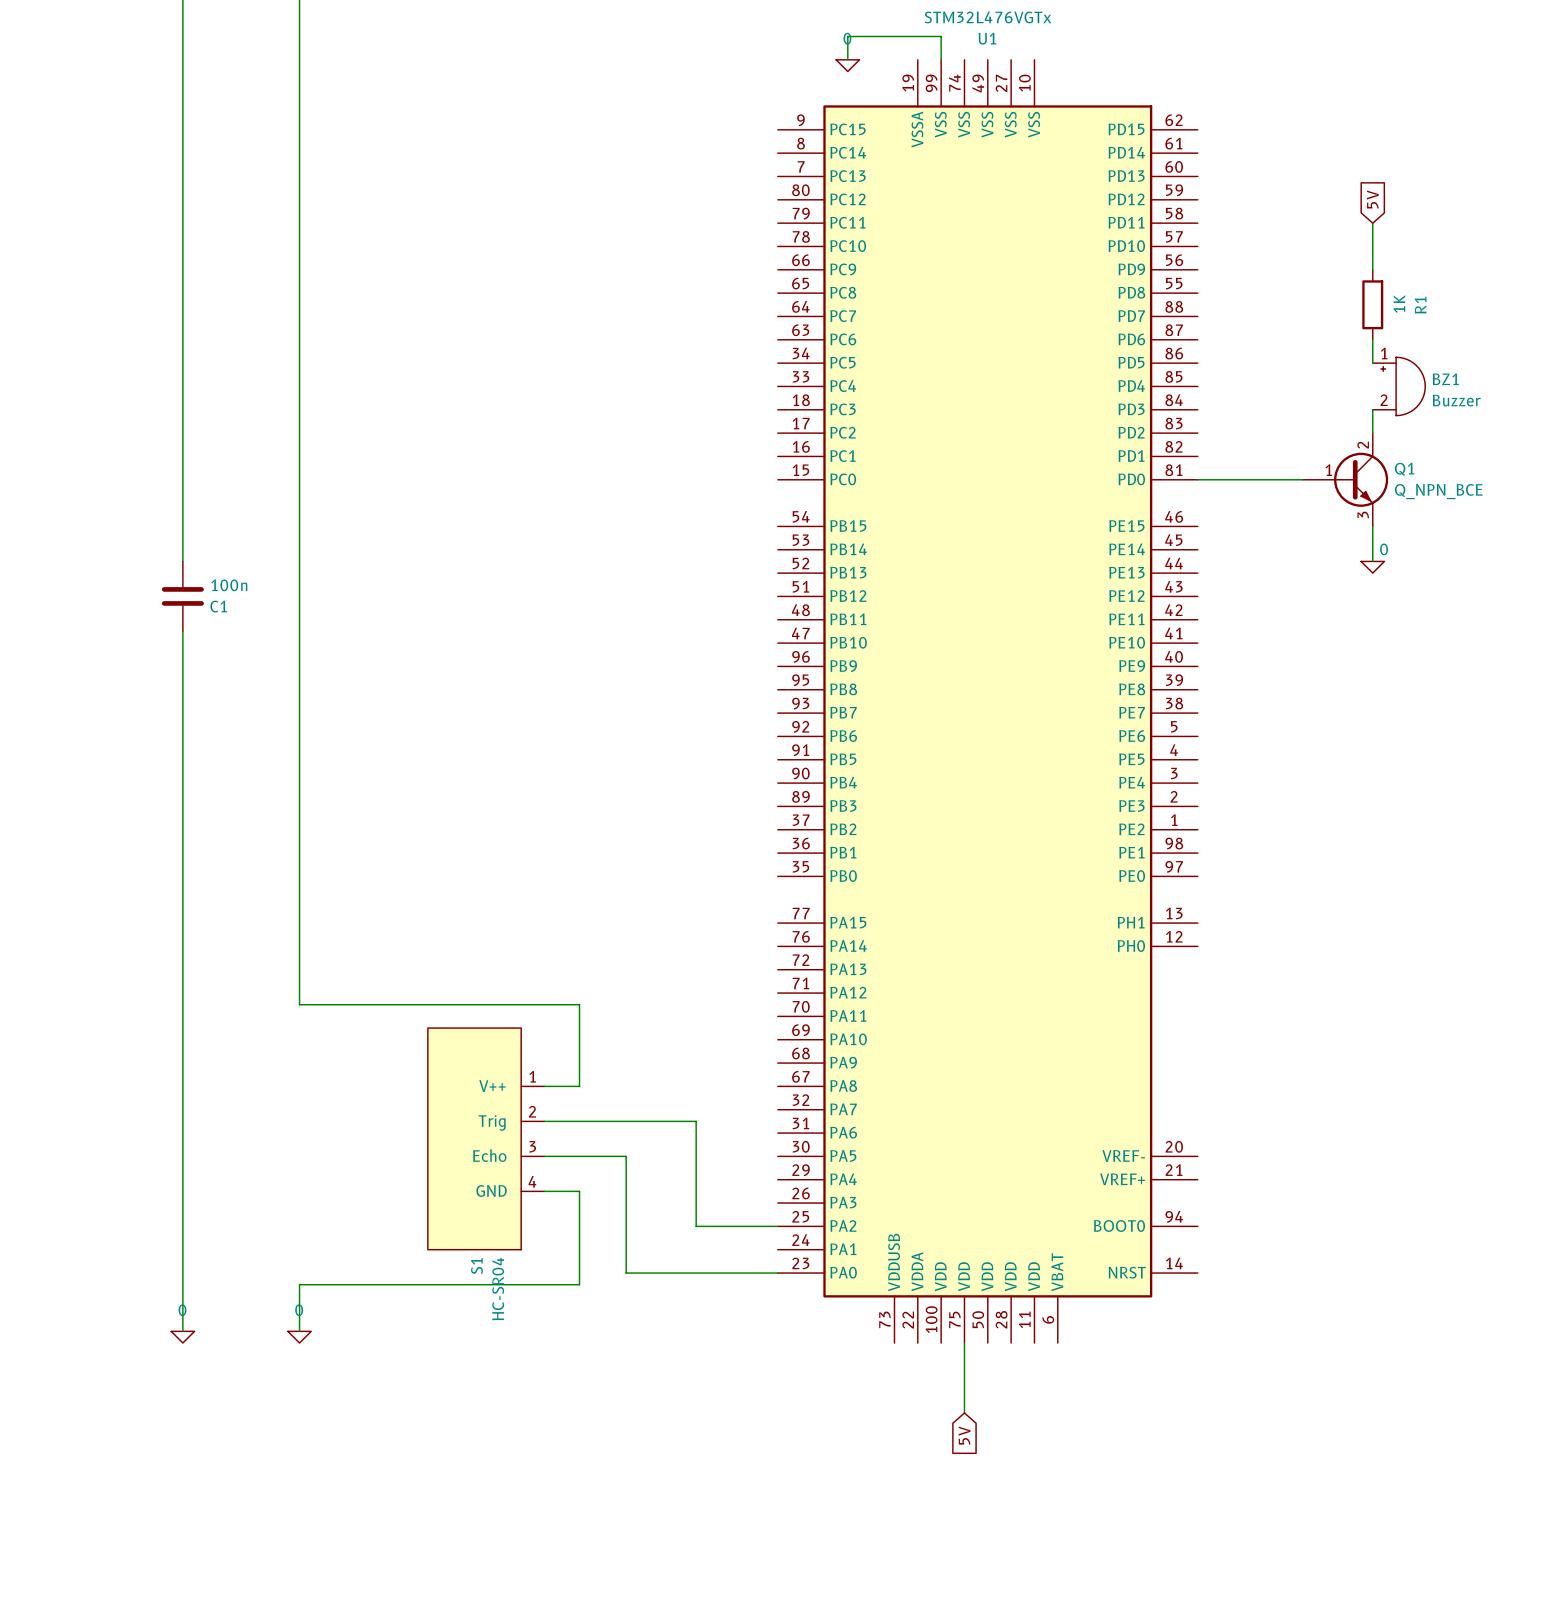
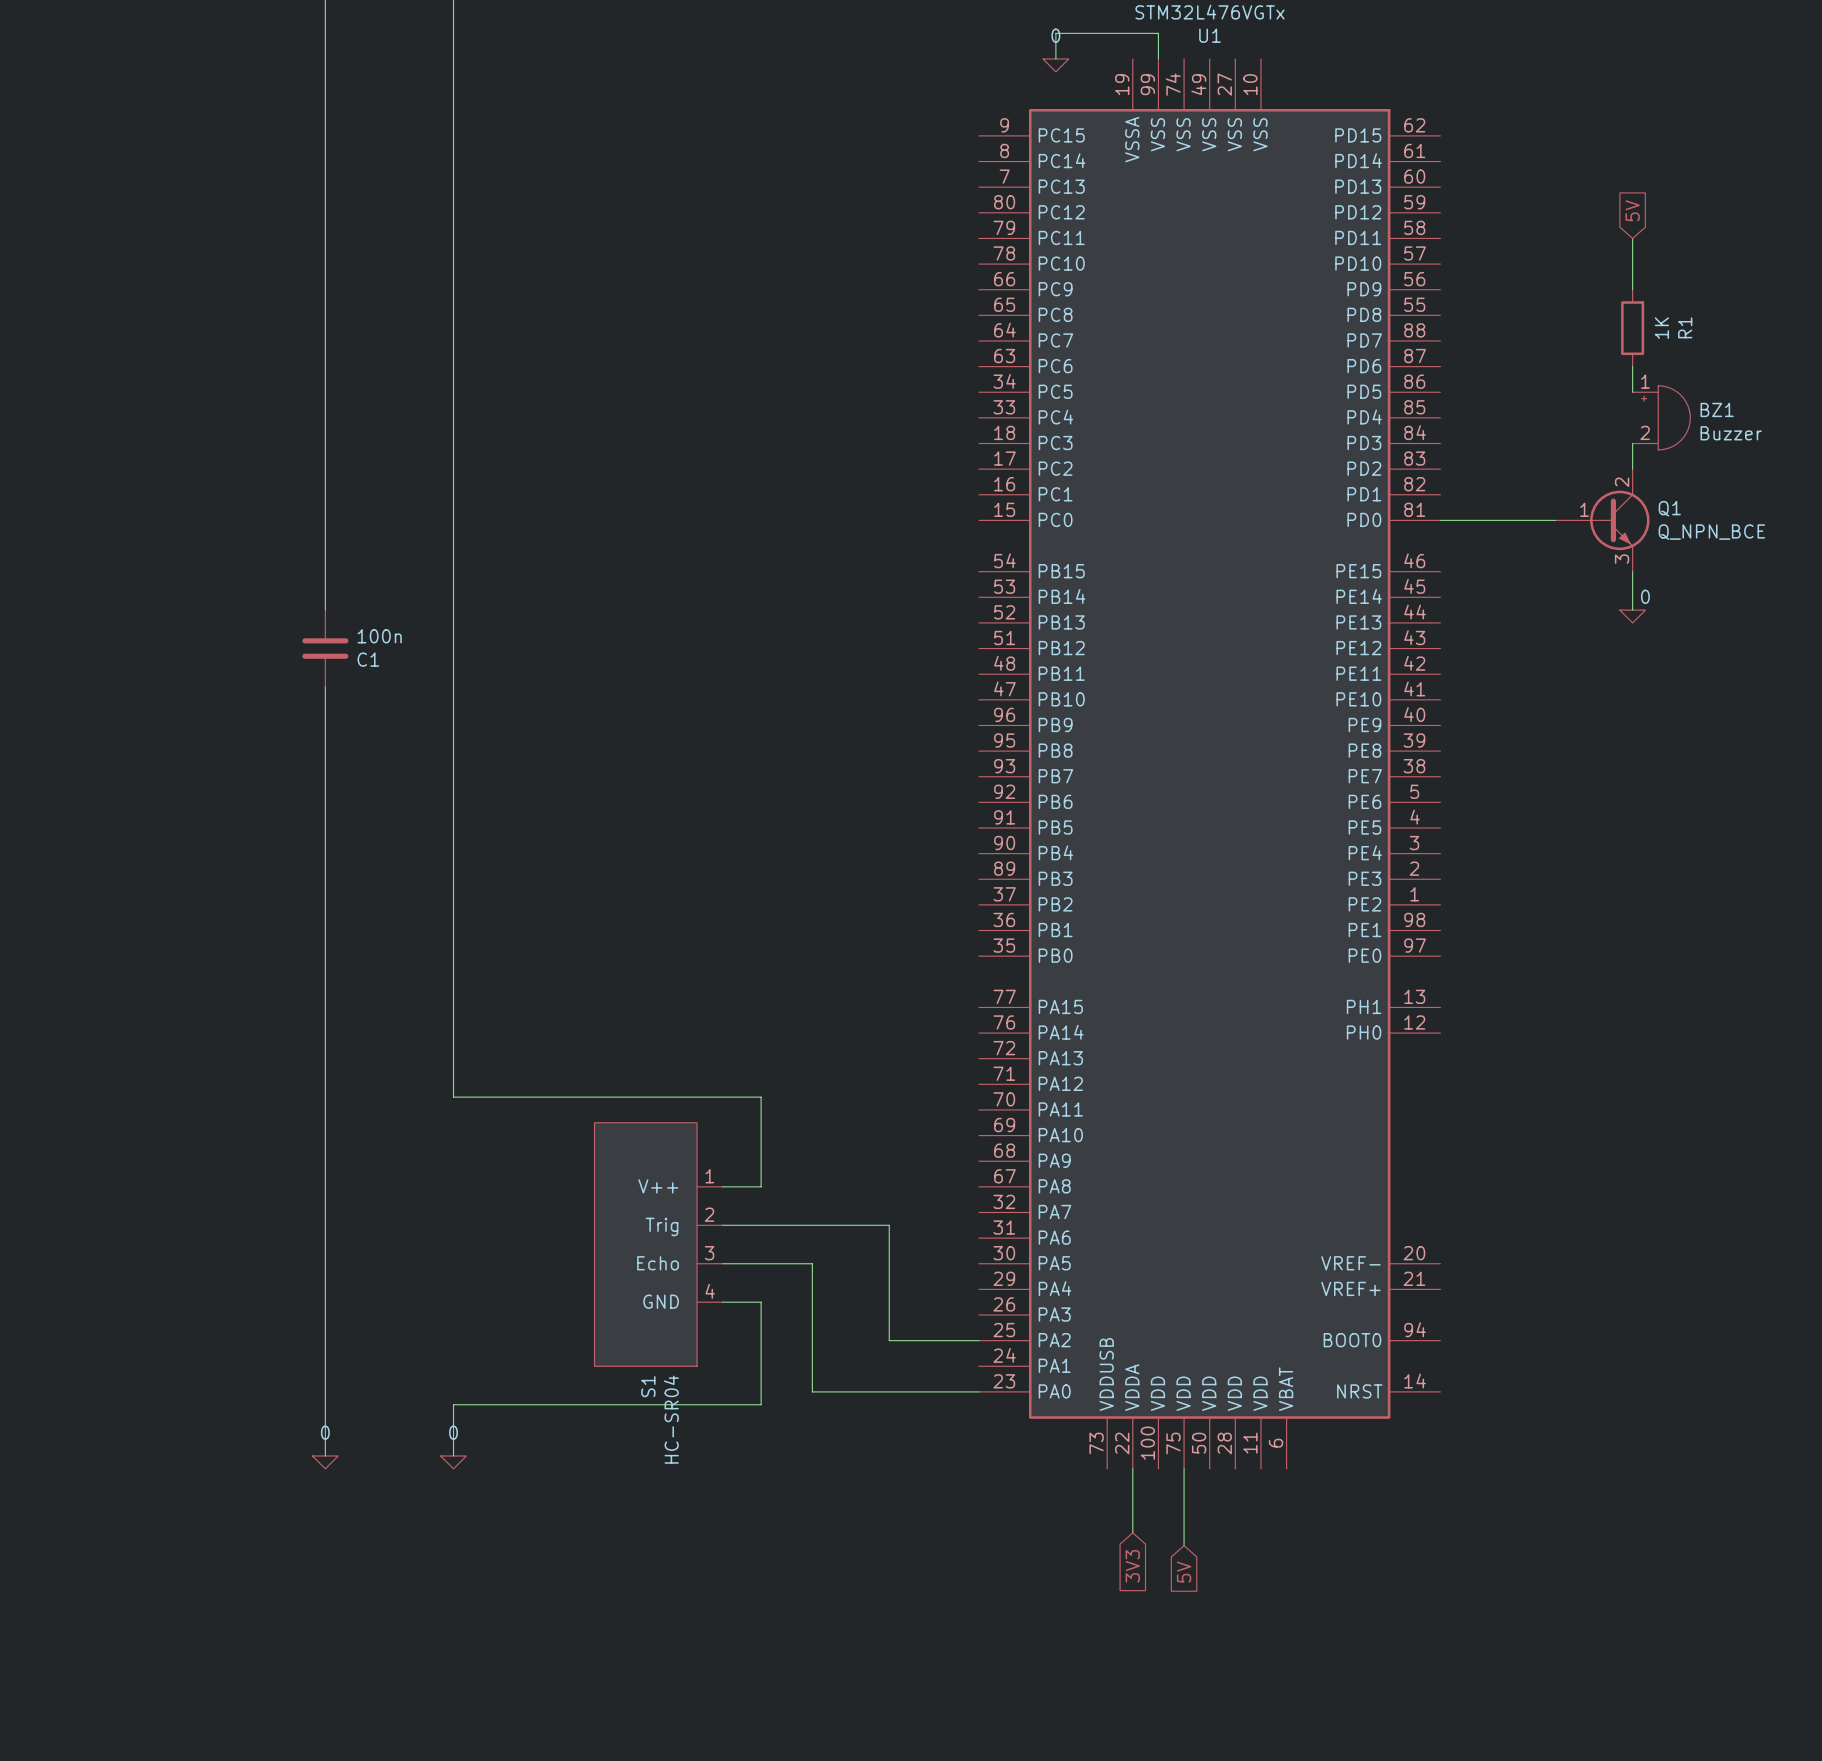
wire: none -> (1132, 1468) (1132, 1532)
global label: none -> 3V3 (1132, 1566)

